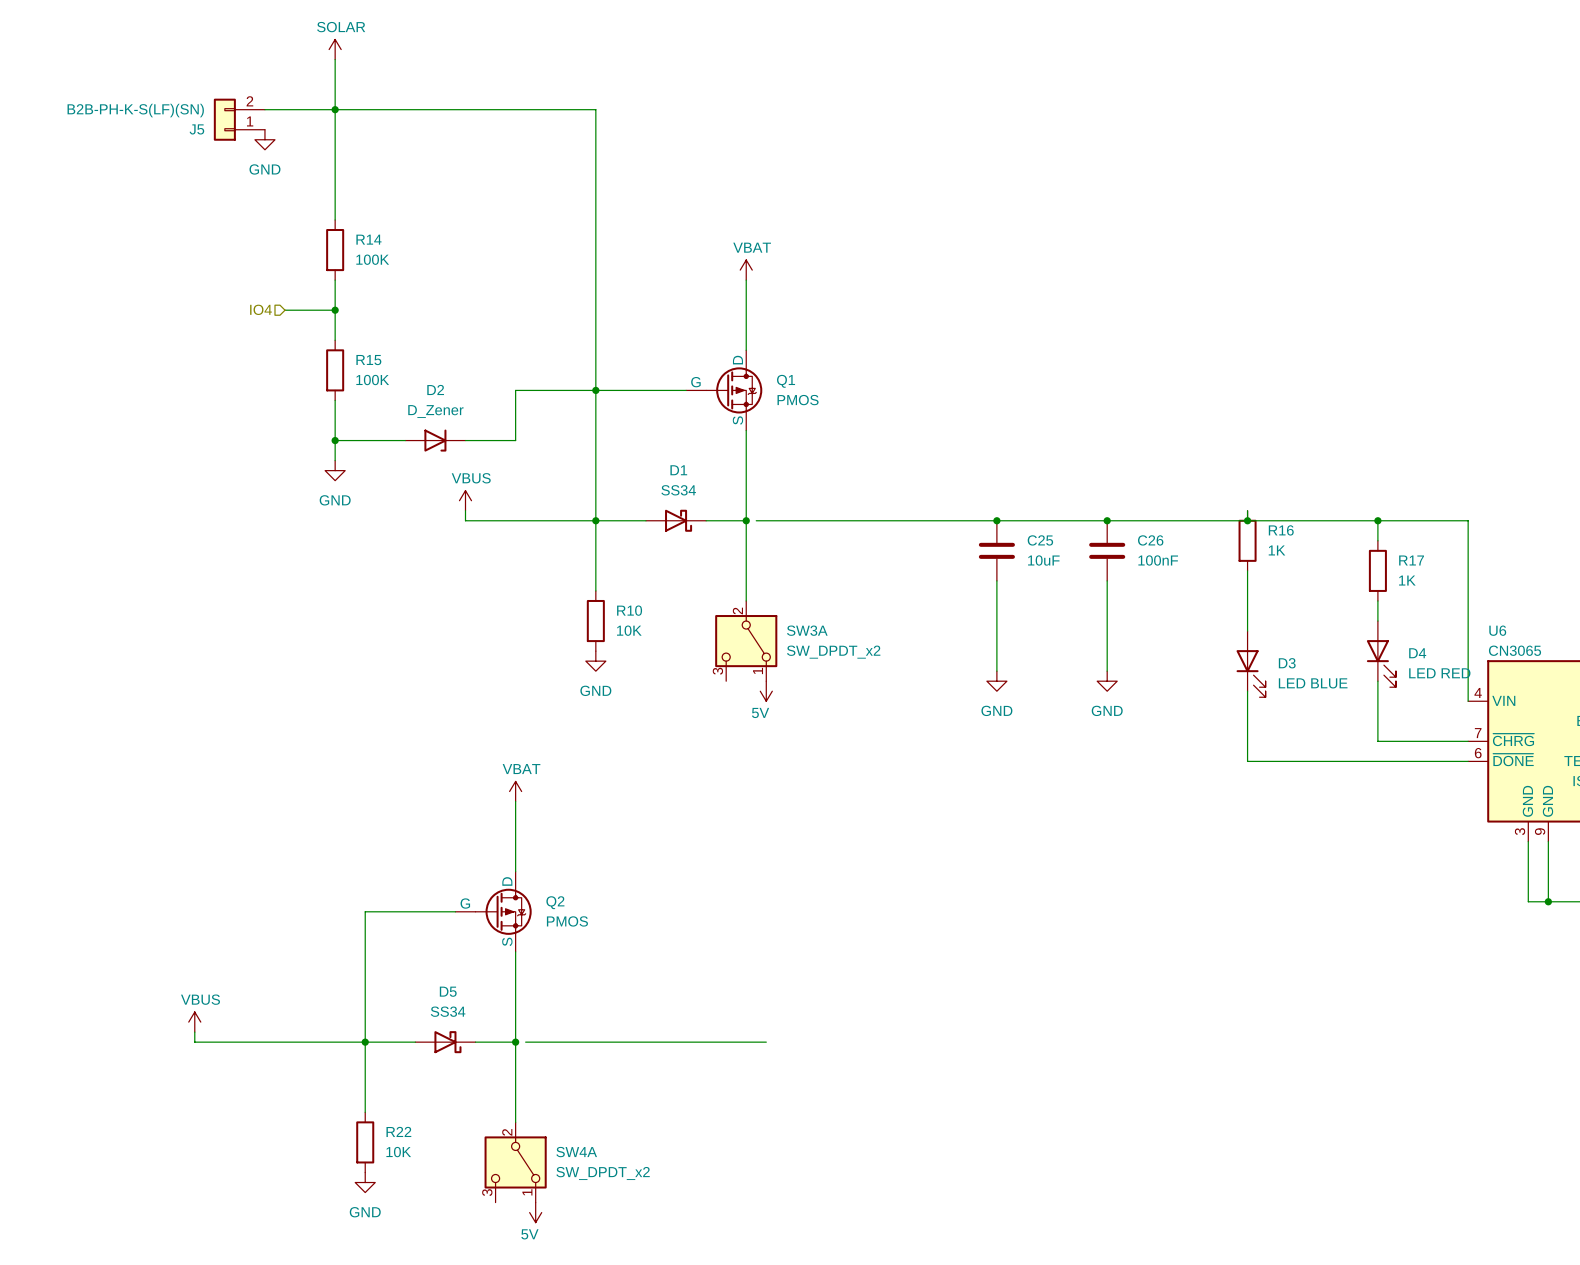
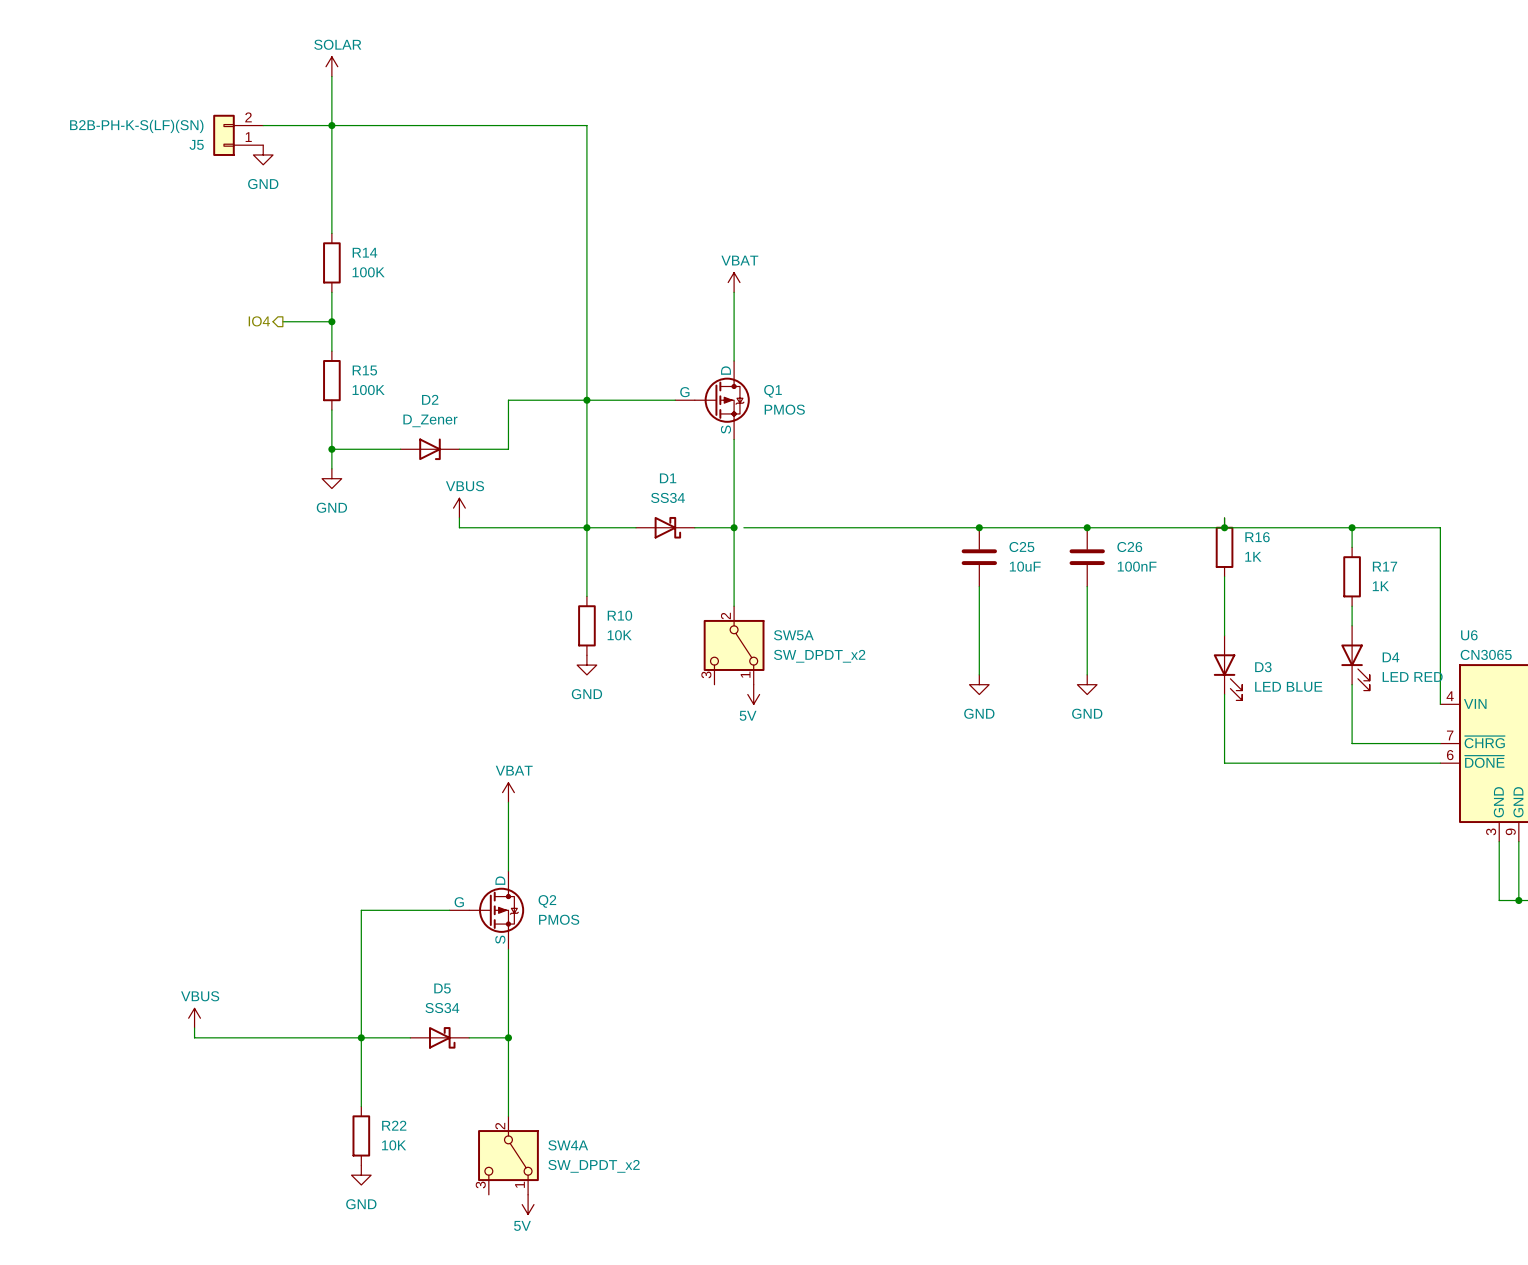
hierarchical label shape: input (261, 309) -> output (259, 321)
SW3A name: SW3A (807, 630) -> SW5A (793, 635)
wire: (525, 1042) (766, 1042) -> none

